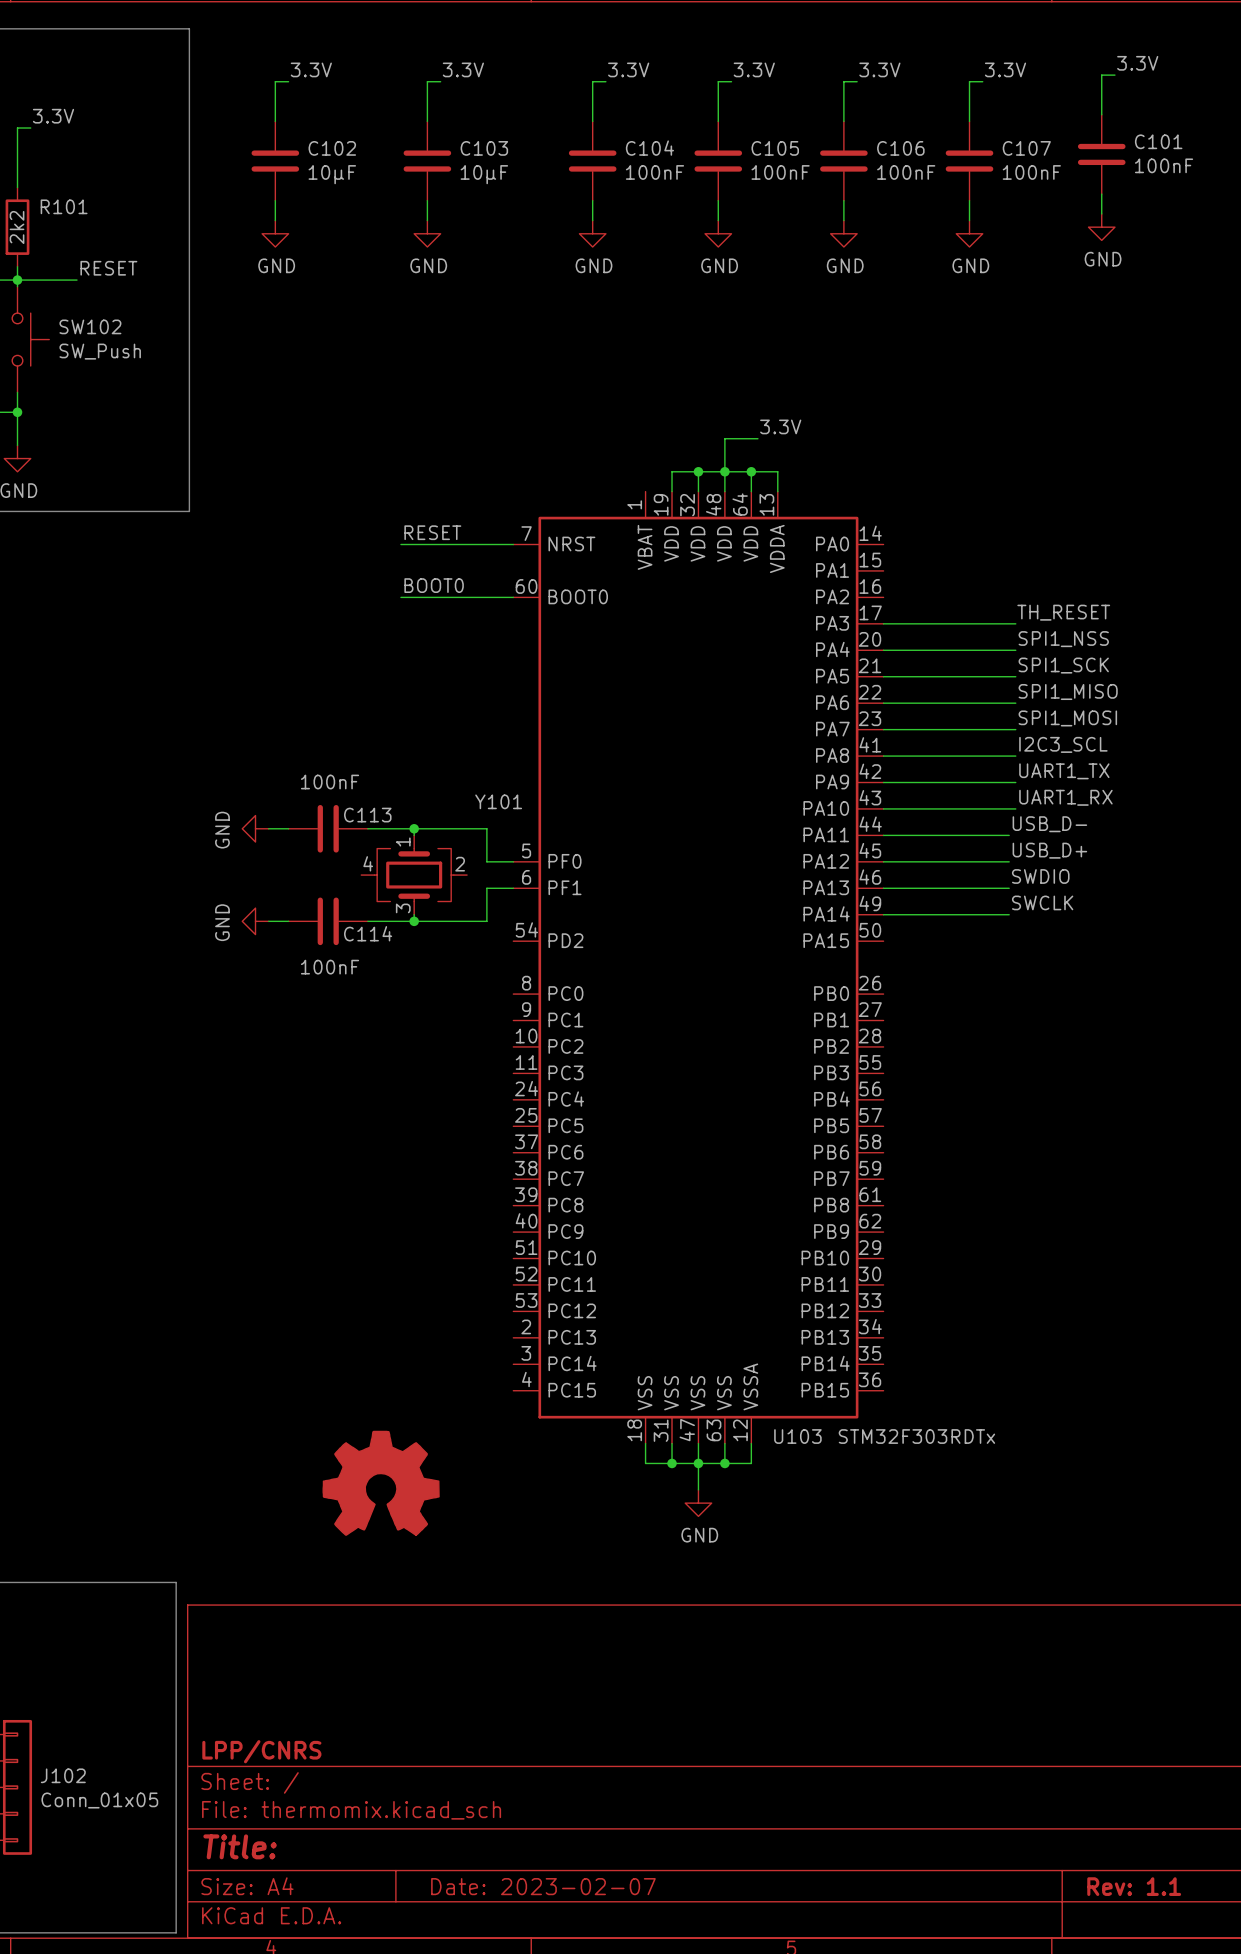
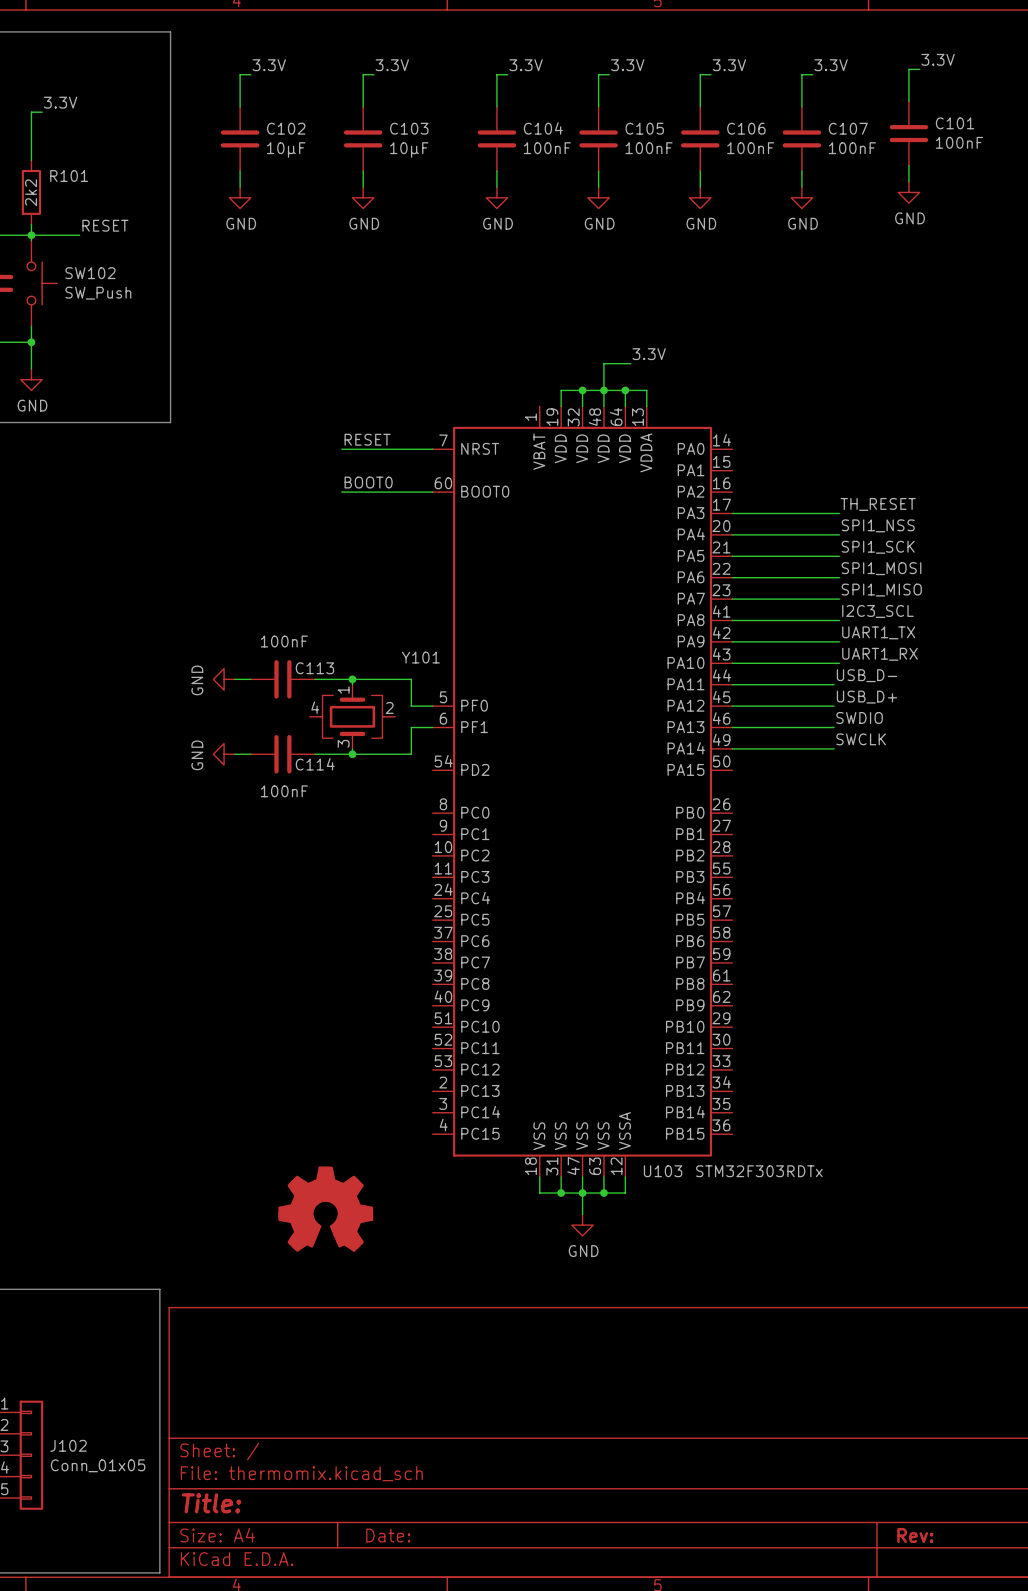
label: SPI1_MISO (1068, 692) -> SPI1_MOSI (881, 568)
label: SPI1_MOSI (1067, 718) -> SPI1_MISO (881, 590)
title block: LPP/CNRS (261, 1751) -> none
title block: Date: 2023-02-07 (543, 1886) -> Date: (388, 1535)
title block: Rev: 1.1 (1134, 1886) -> Rev: (915, 1535)

